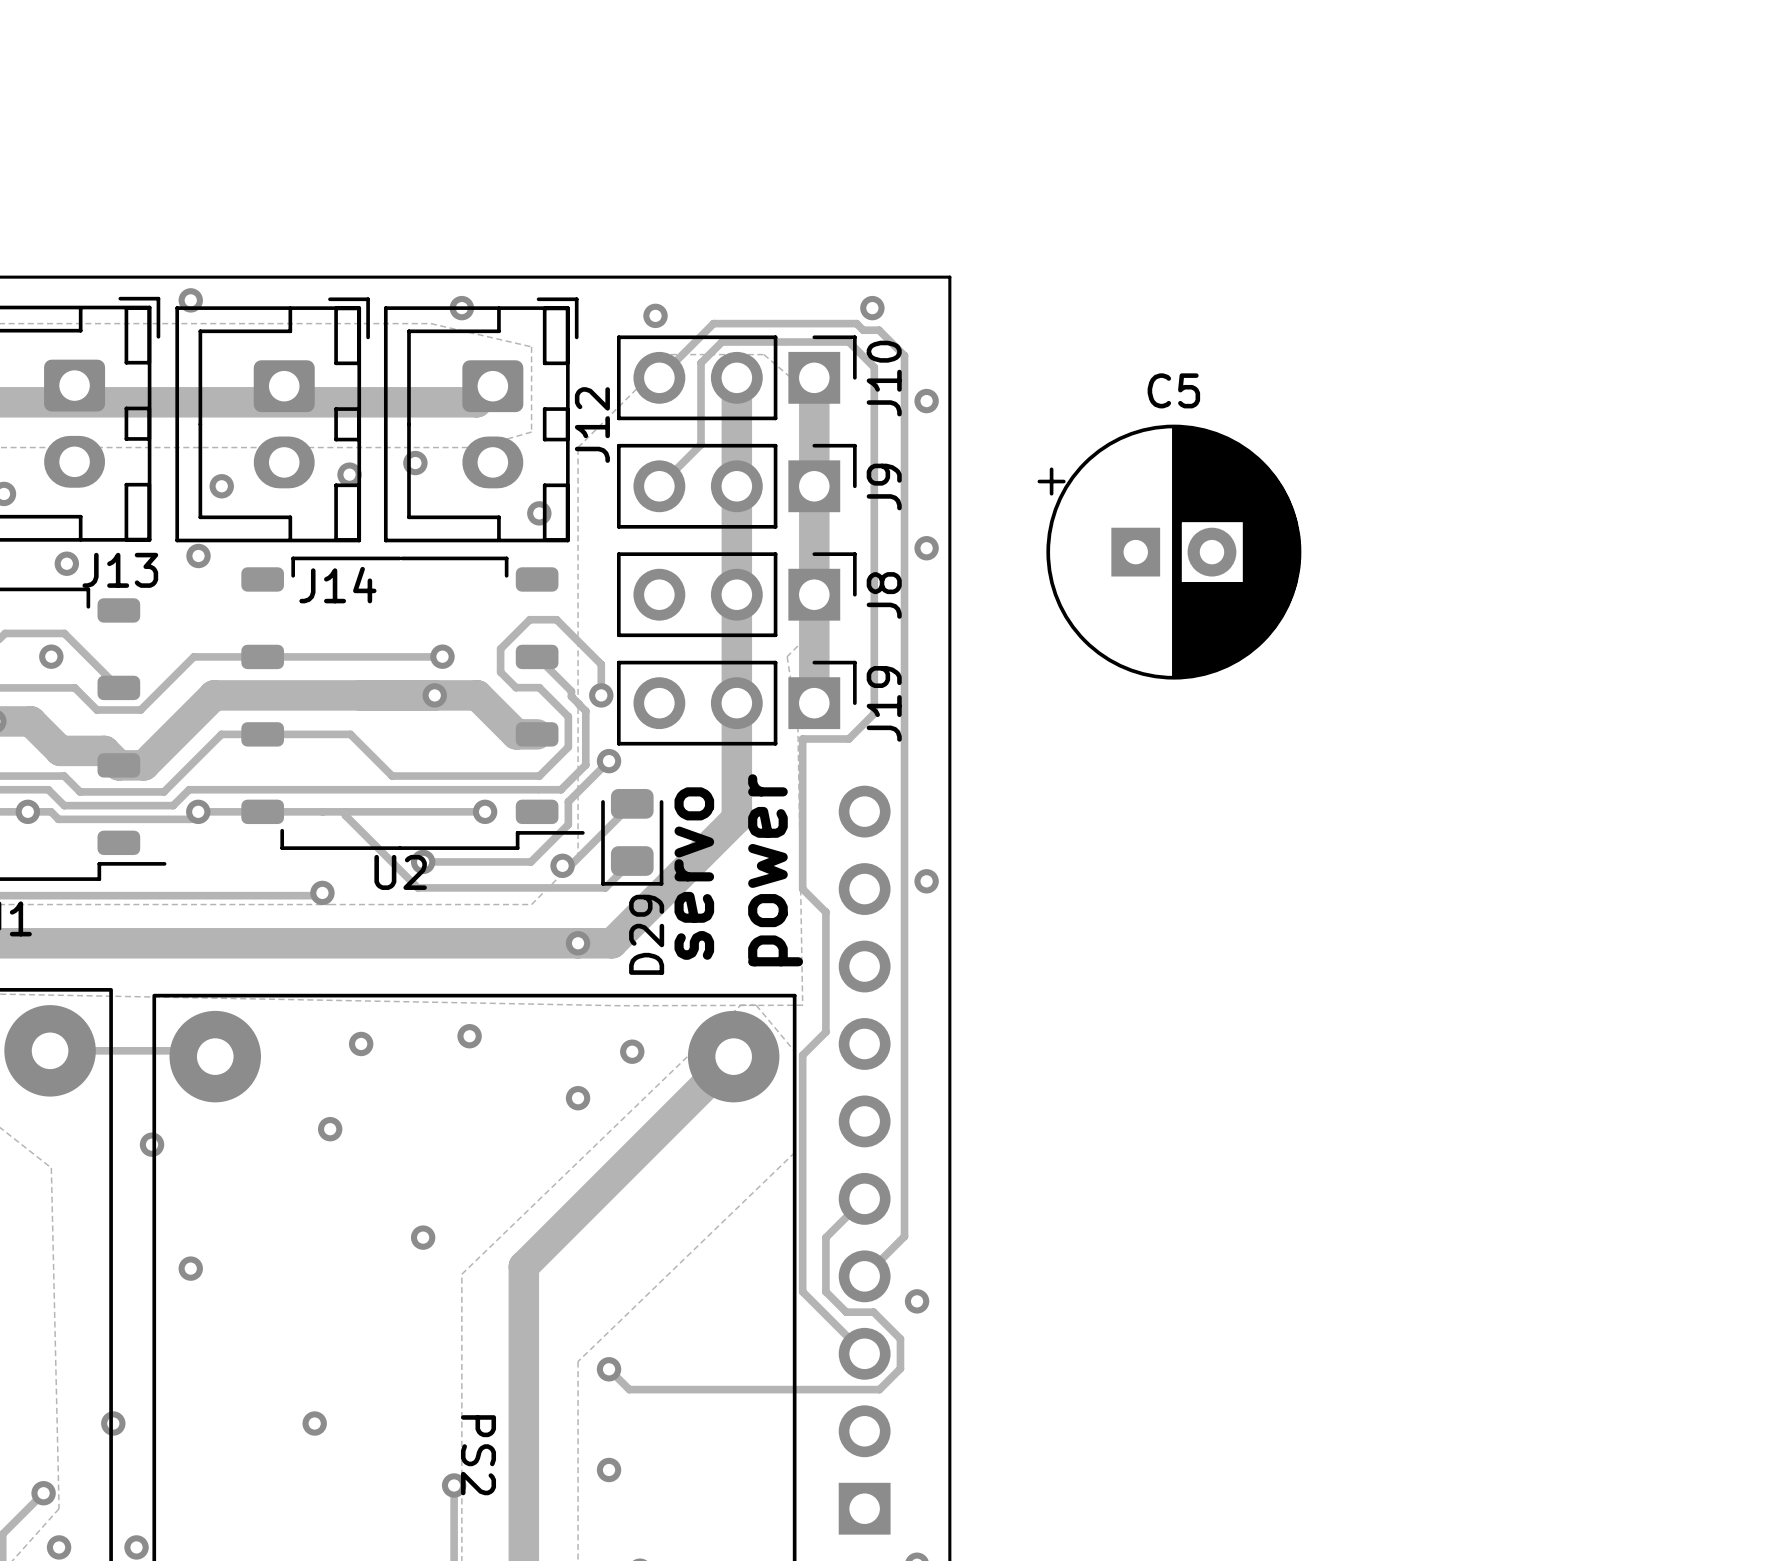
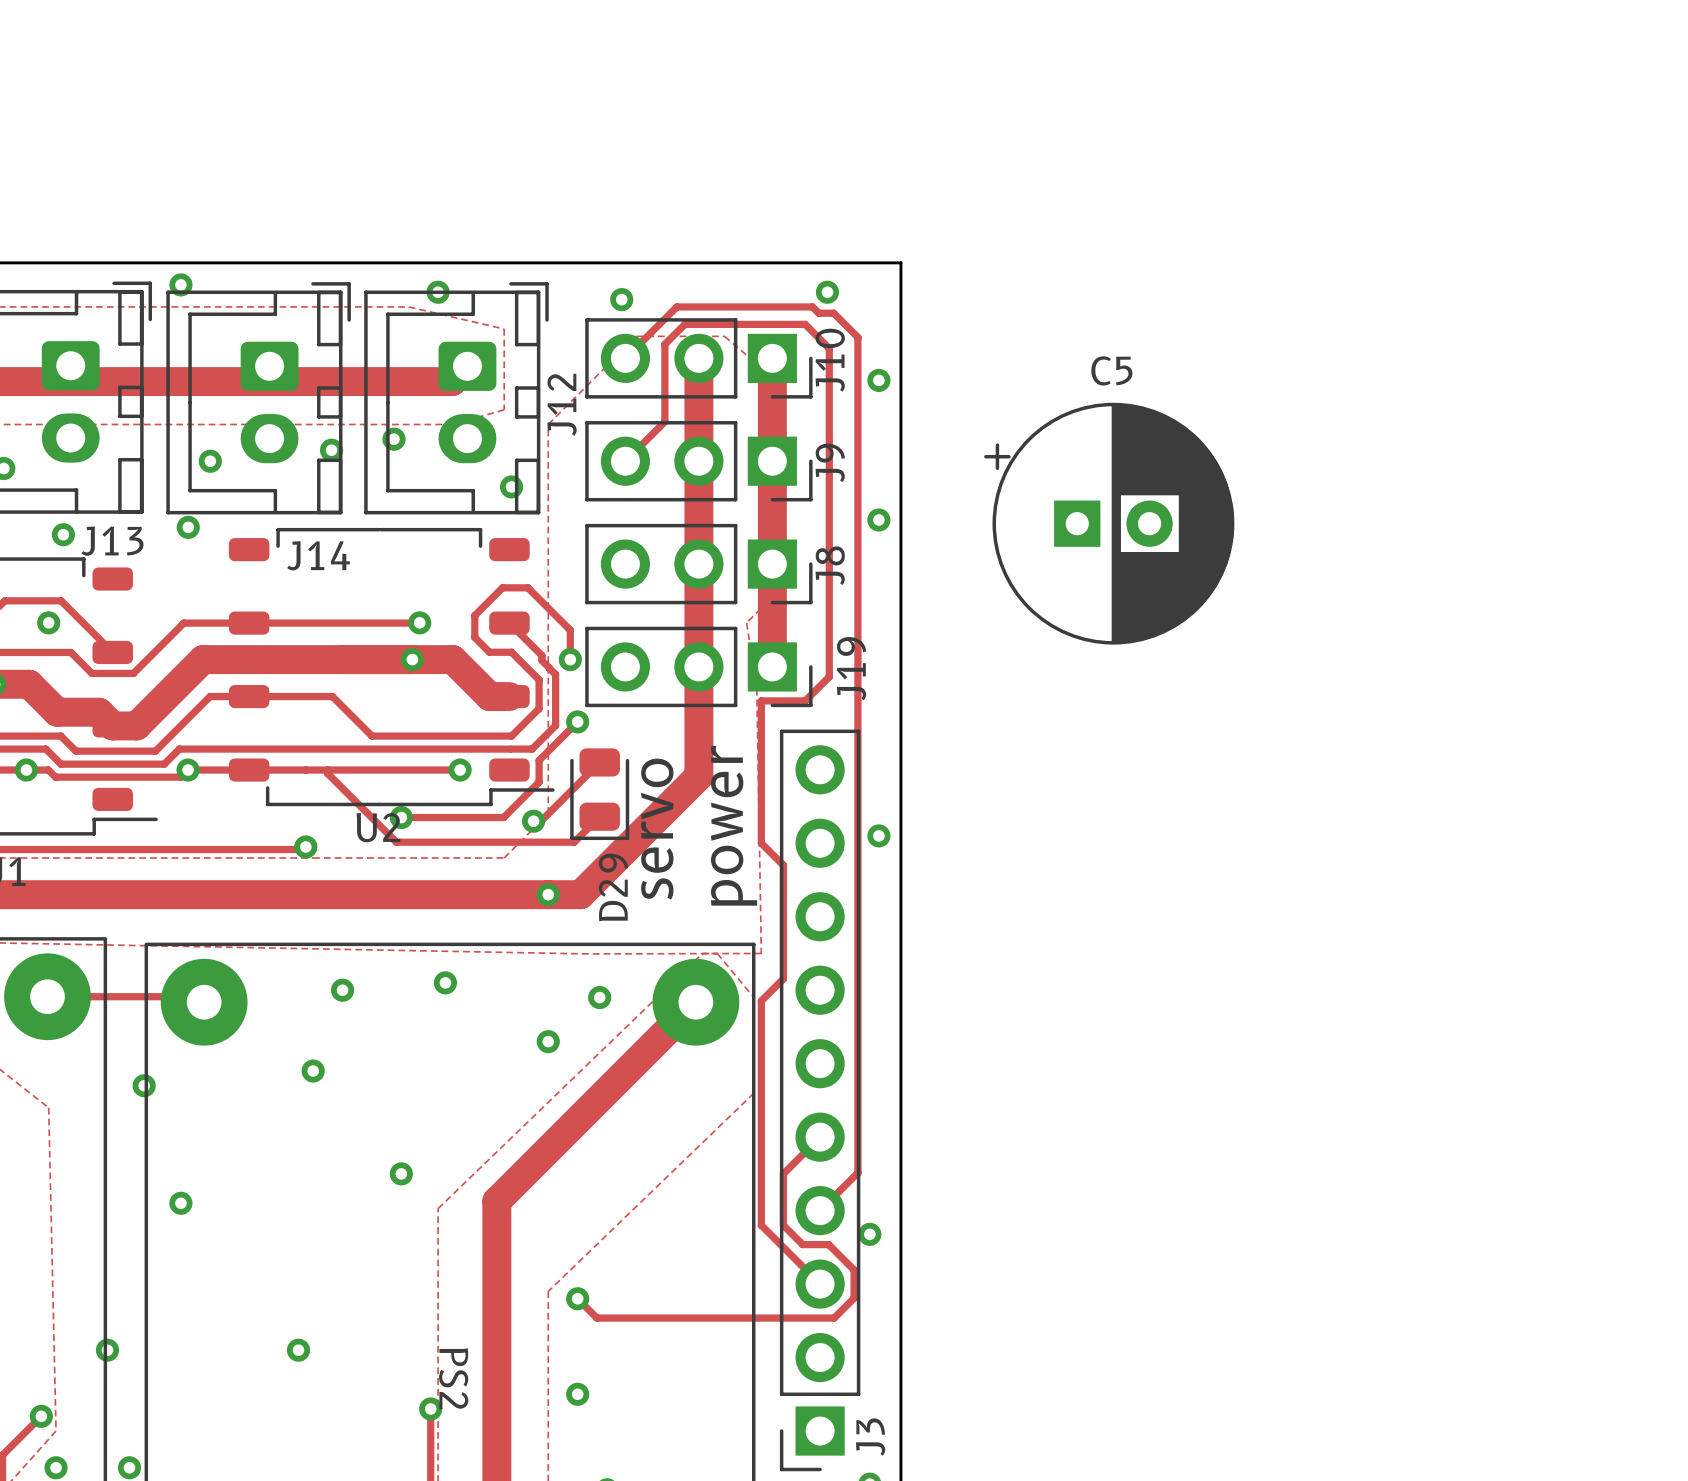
J10 footprint: [616, 335, 857, 421] -> [585, 318, 813, 399]
J9 footprint: [616, 443, 857, 529] -> [585, 421, 813, 502]
J8 footprint: [616, 552, 857, 638] -> [585, 523, 813, 605]
J19 footprint: [616, 660, 857, 746] -> [585, 626, 813, 708]
J3 side: bottom (864, 1160) -> top (820, 1100)

